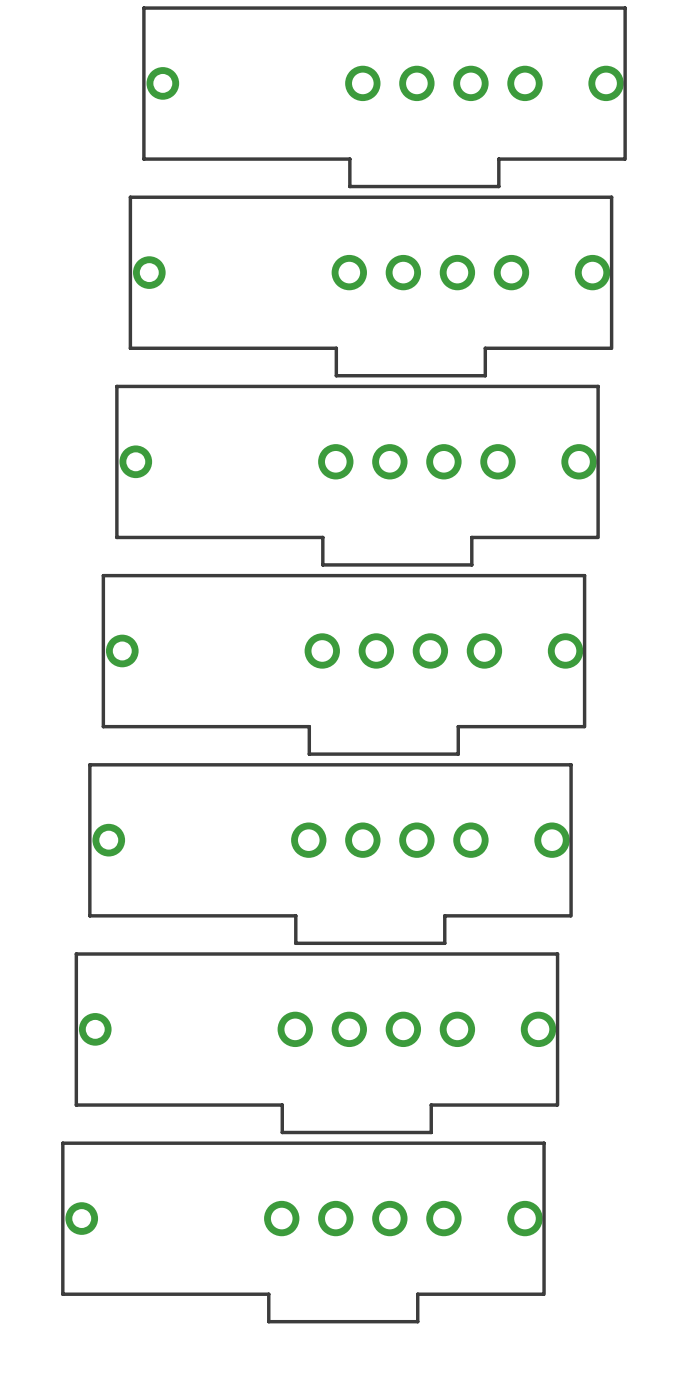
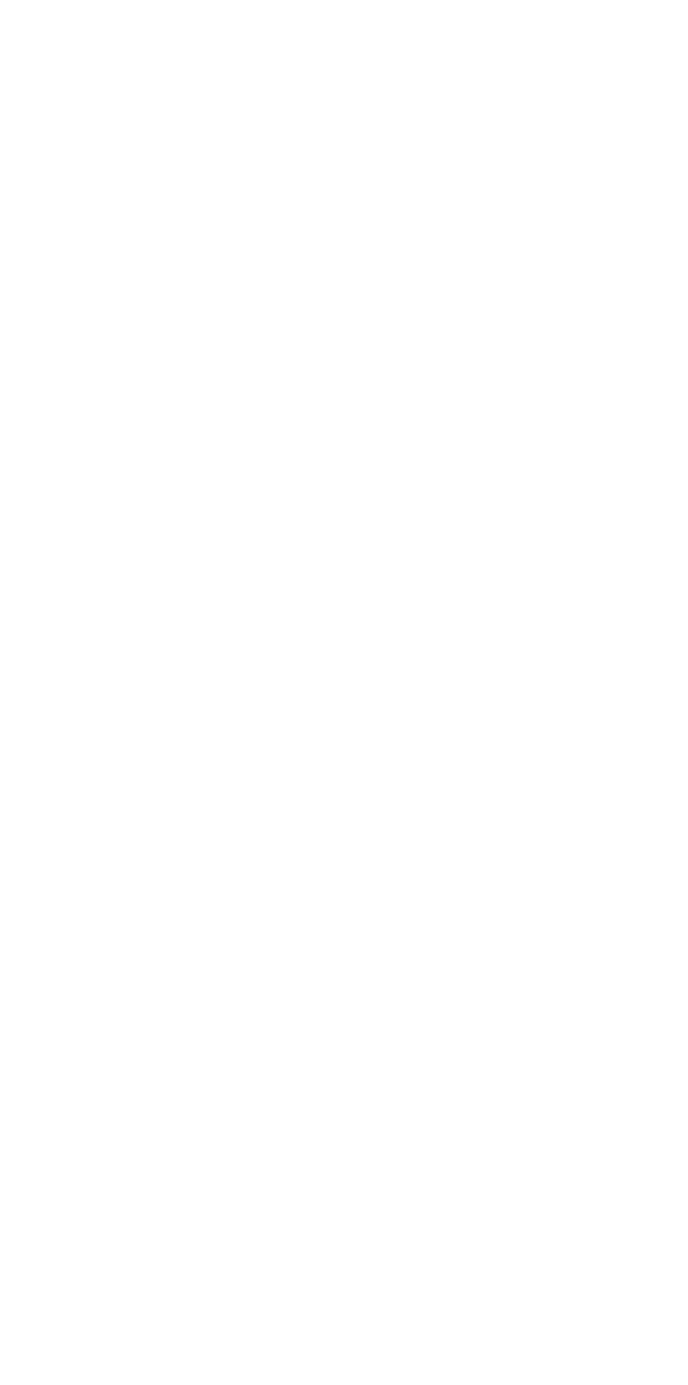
part: (384, 97) -> none
part: (371, 286) -> none
part: (357, 475) -> none
part: (343, 664) -> none
part: (330, 854) -> none
part: (316, 1043) -> none
part: (303, 1232) -> none

